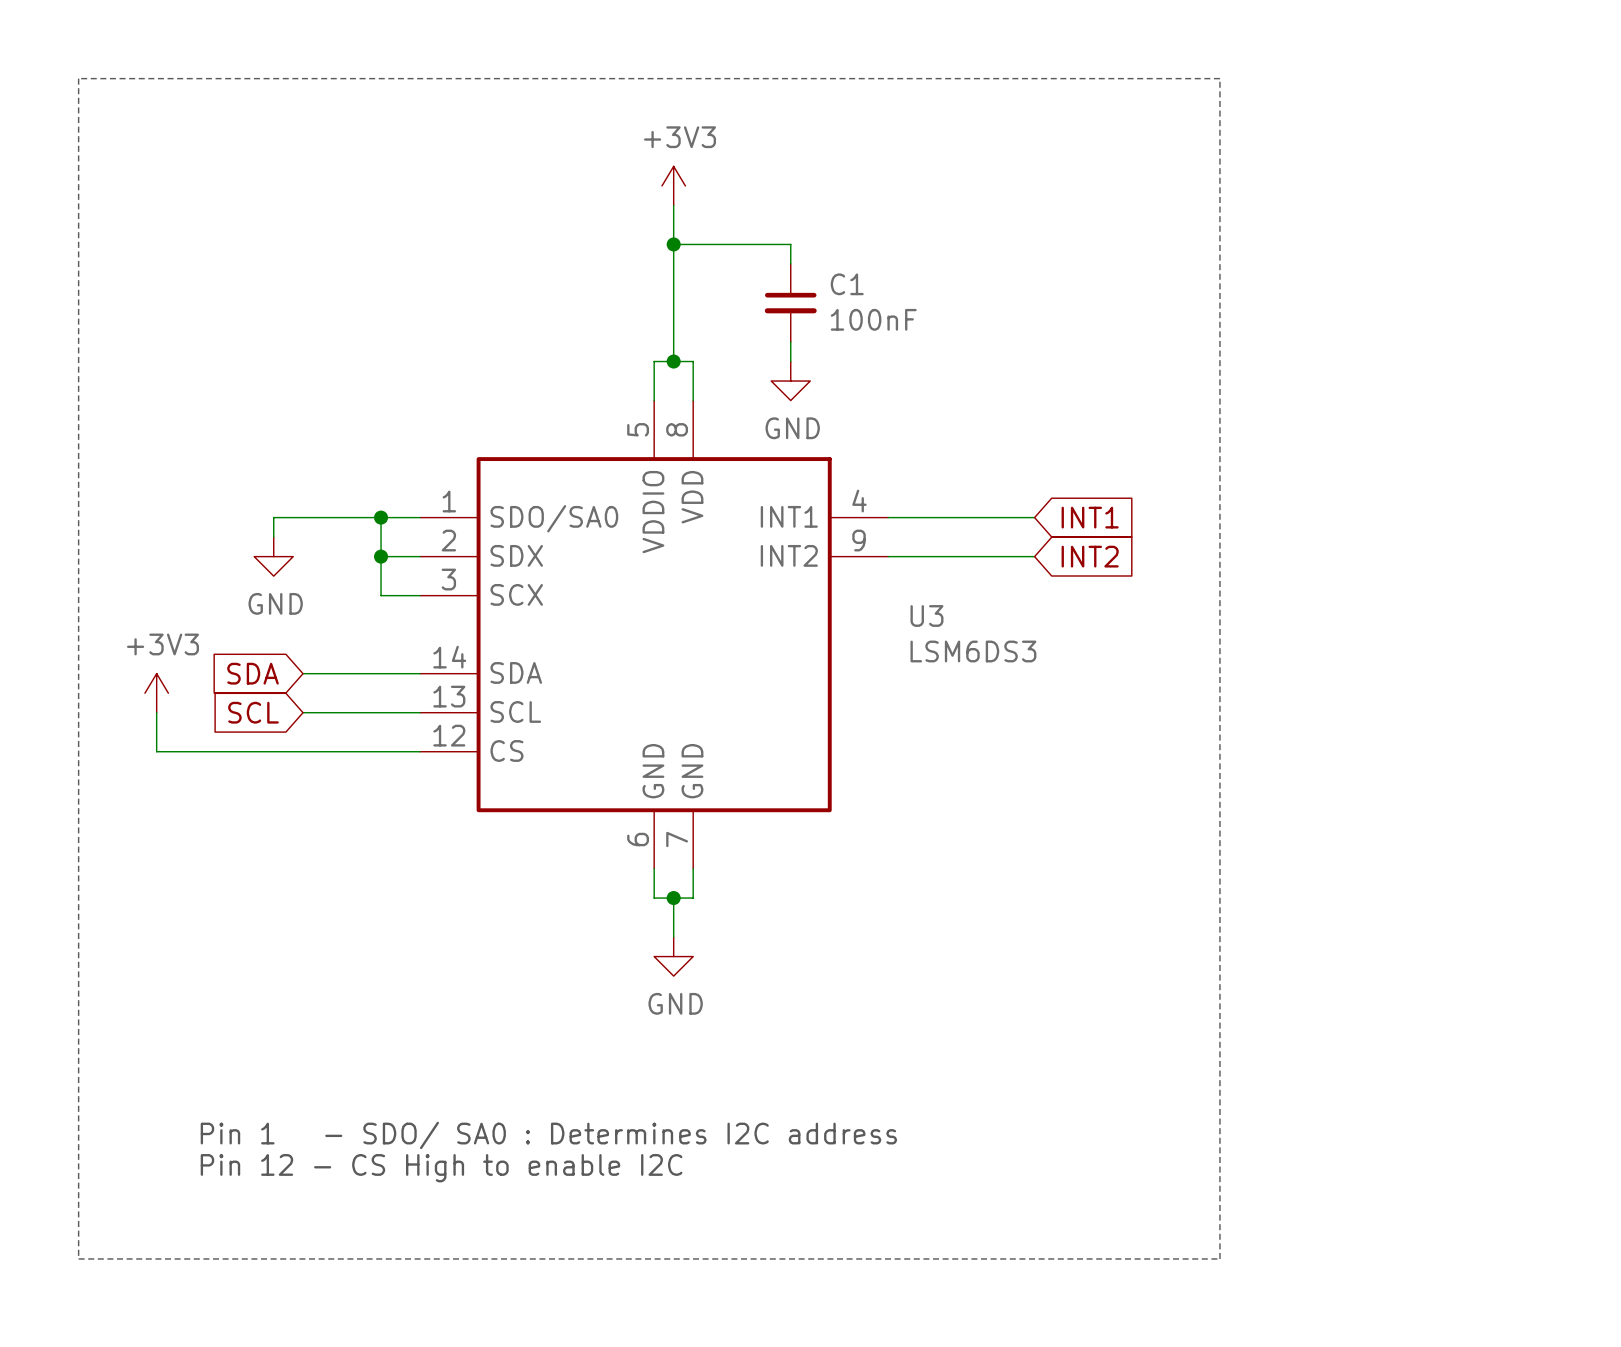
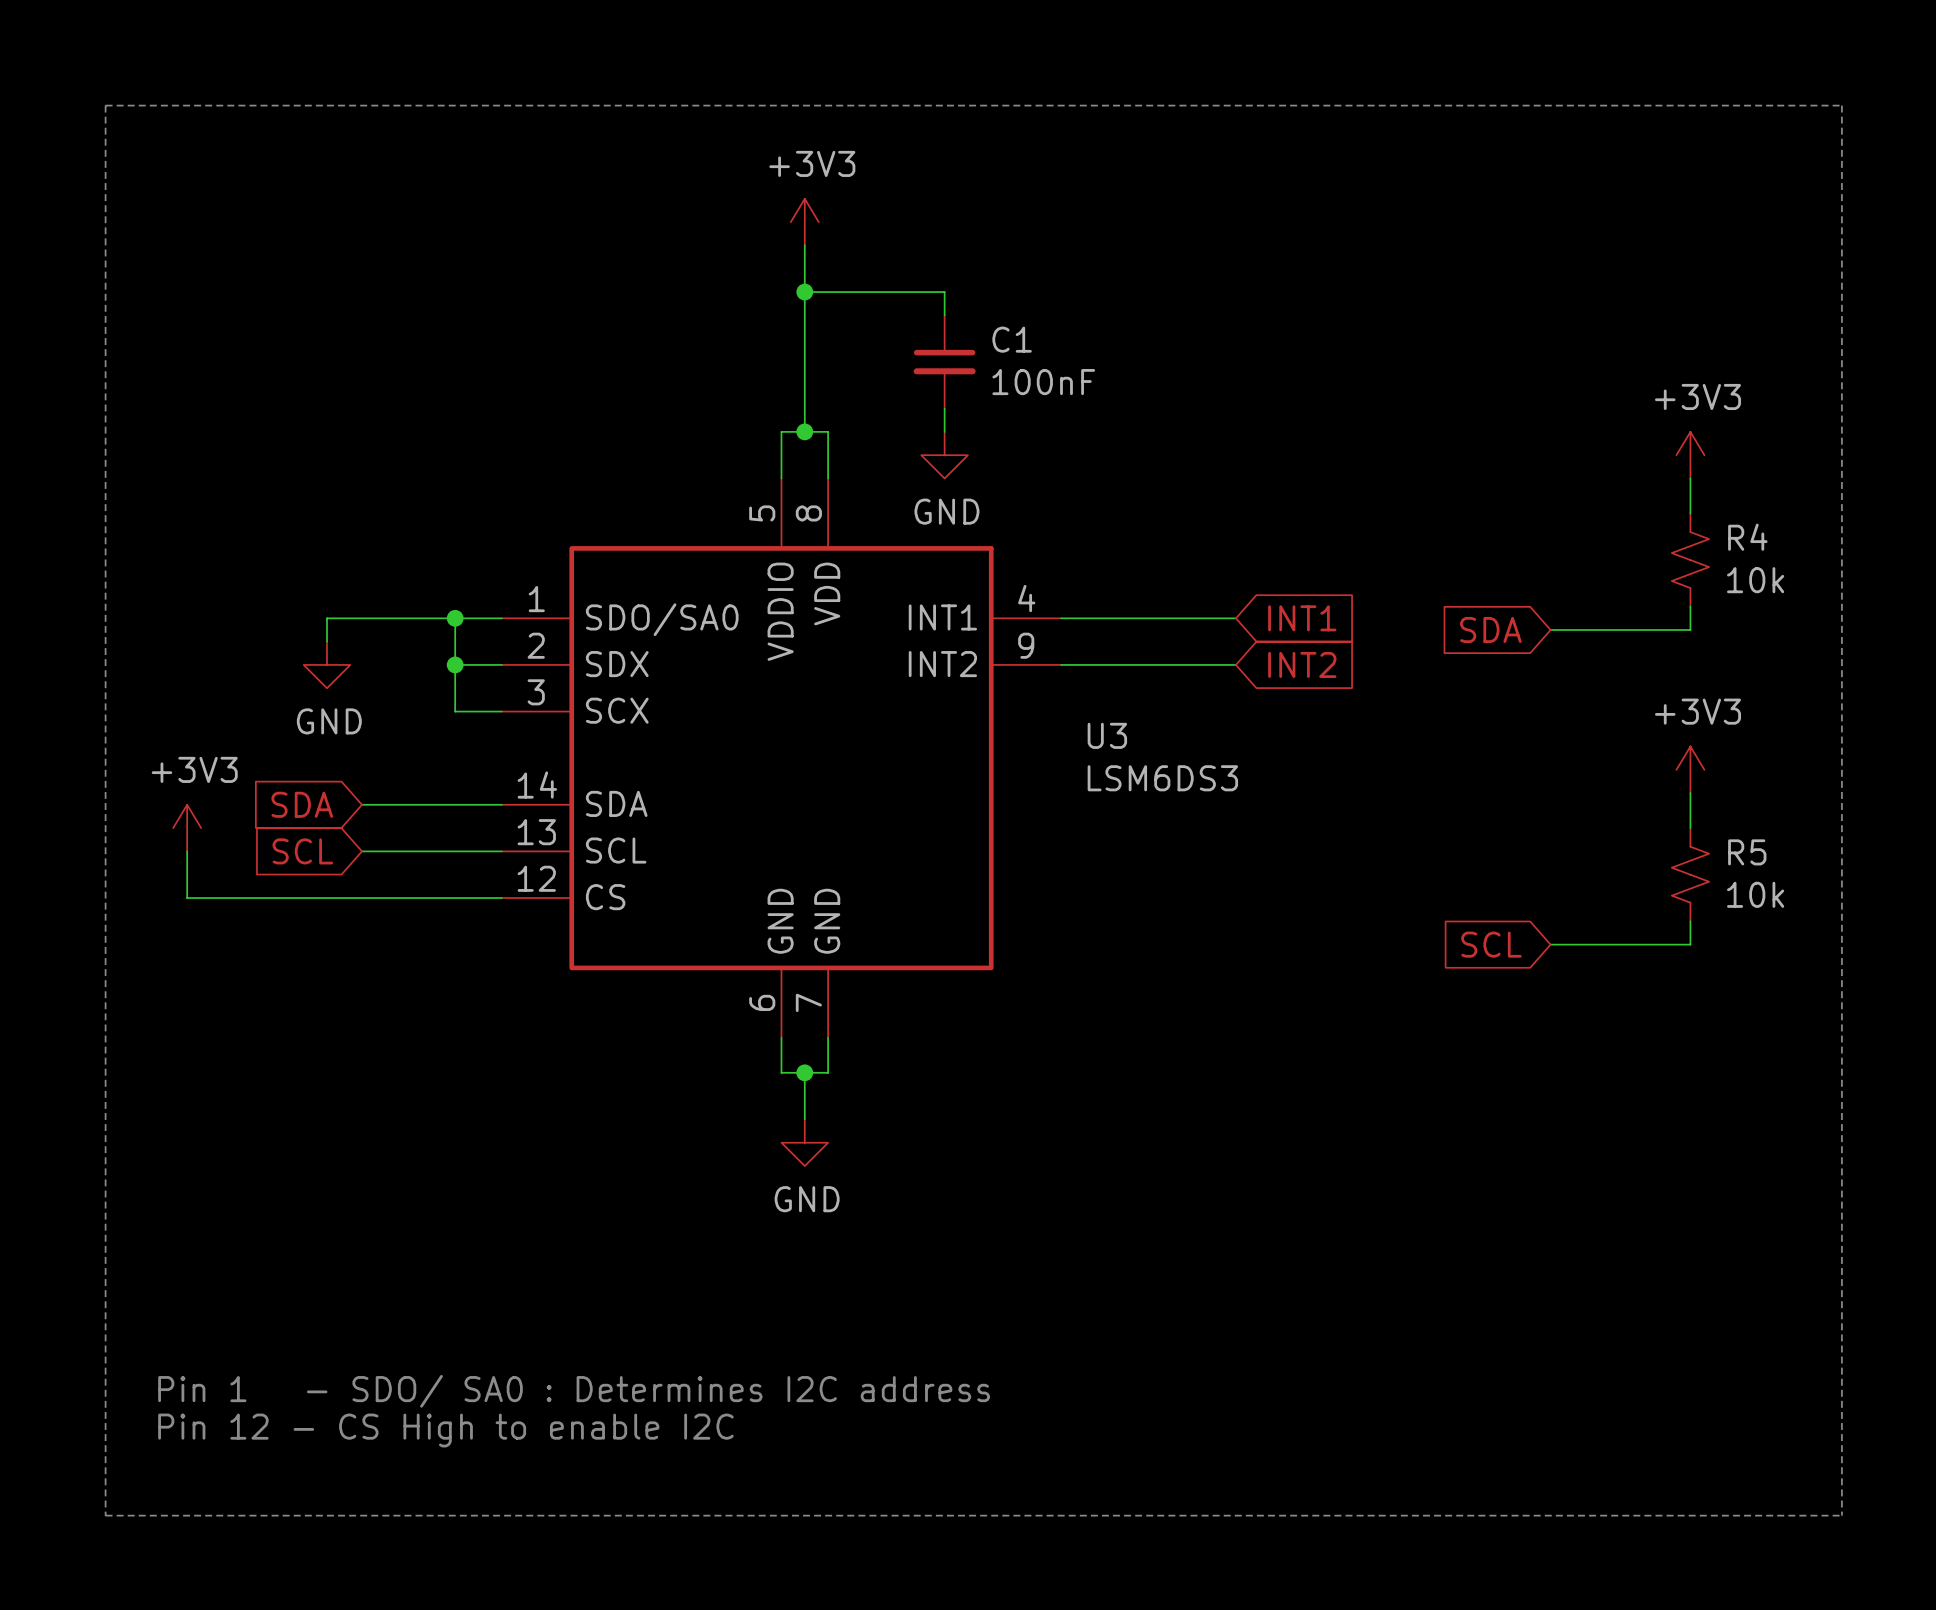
line: (78, 78) (1219, 78) (1219, 1258) (78, 1258) (78, 78) -> (105, 105) (105, 1515) (1841, 1515) (1841, 105) (105, 105)
power symbol: none -> +3V3 (1690, 455)
wire: none -> (1690, 478) (1690, 513)
R4: none -> 10k (1690, 560)
wire: none -> (1690, 606) (1690, 629) (1550, 629)
global label: none -> SDA (1490, 629)
power symbol: none -> +3V3 (1690, 769)
wire: none -> (1690, 793) (1690, 828)
R5: none -> 10k (1690, 874)
wire: none -> (1690, 921) (1690, 944) (1550, 944)
global label: none -> SCL (1491, 944)
text position: Pin 1 - SDO/ SA0 : Determines I2C address (548, 1135) -> Pin 1 - SDO/ SA0 : Determines I2C address (574, 1391)
text position: Pin 12 - CS High to enable I2C (441, 1168) -> Pin 12 - CS High to enable I2C (445, 1430)

